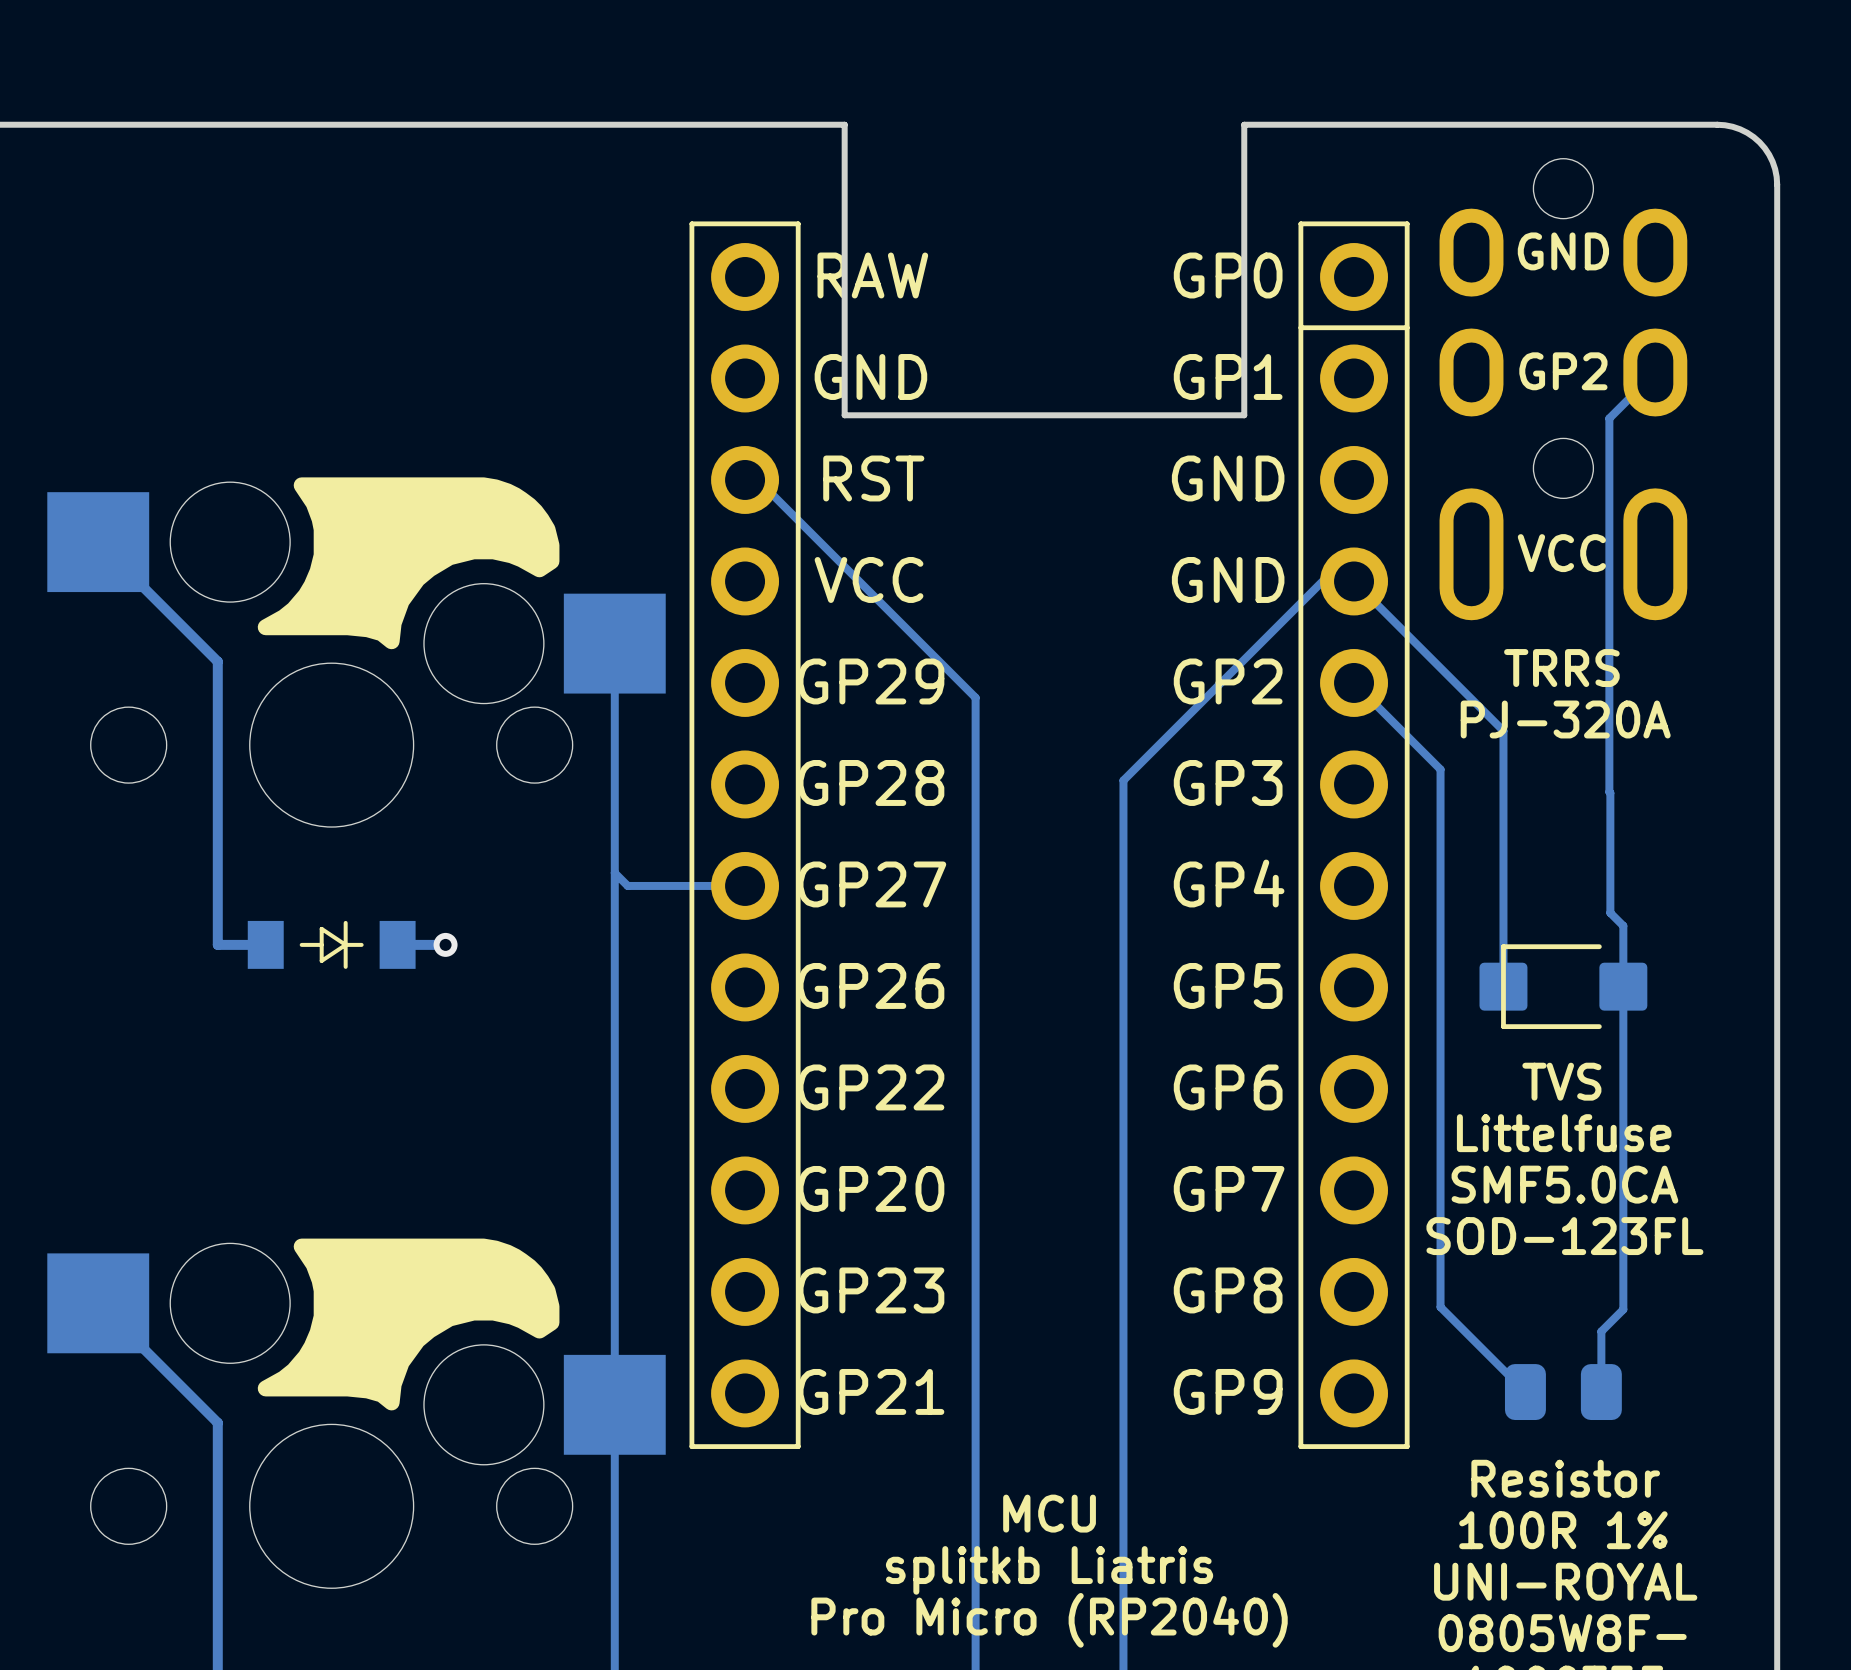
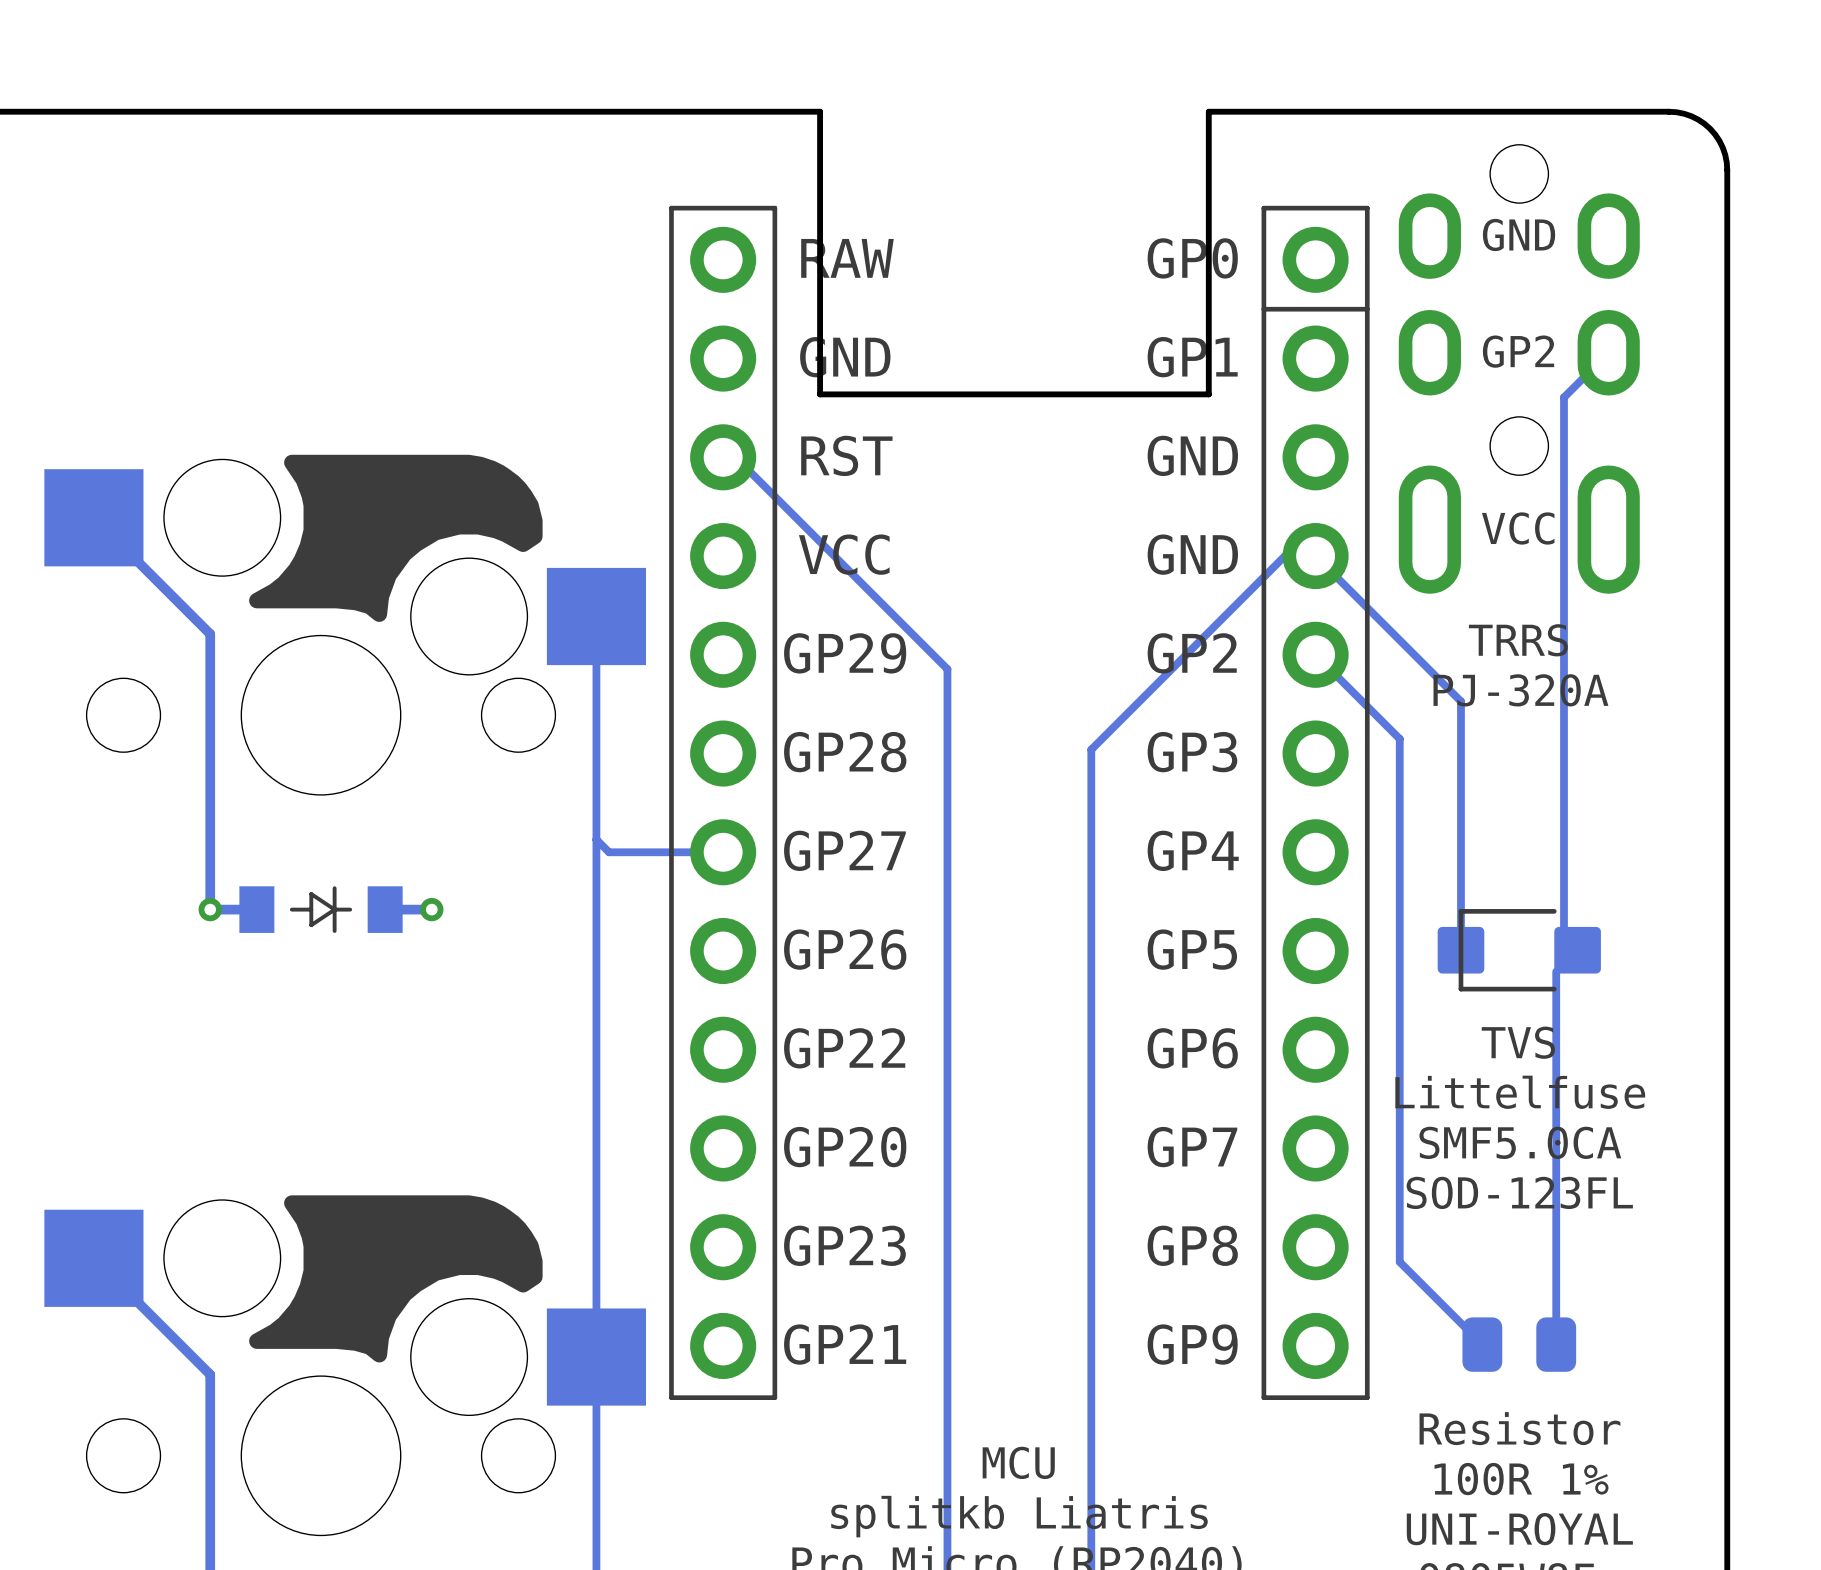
track: (1609, 792) (1610, 912) (1623, 925) (1623, 1309) (1601, 1331) -> (1556, 971) (1556, 1285)
track: none -> (1563, 760) (1563, 936)
via: none -> (210, 909)

